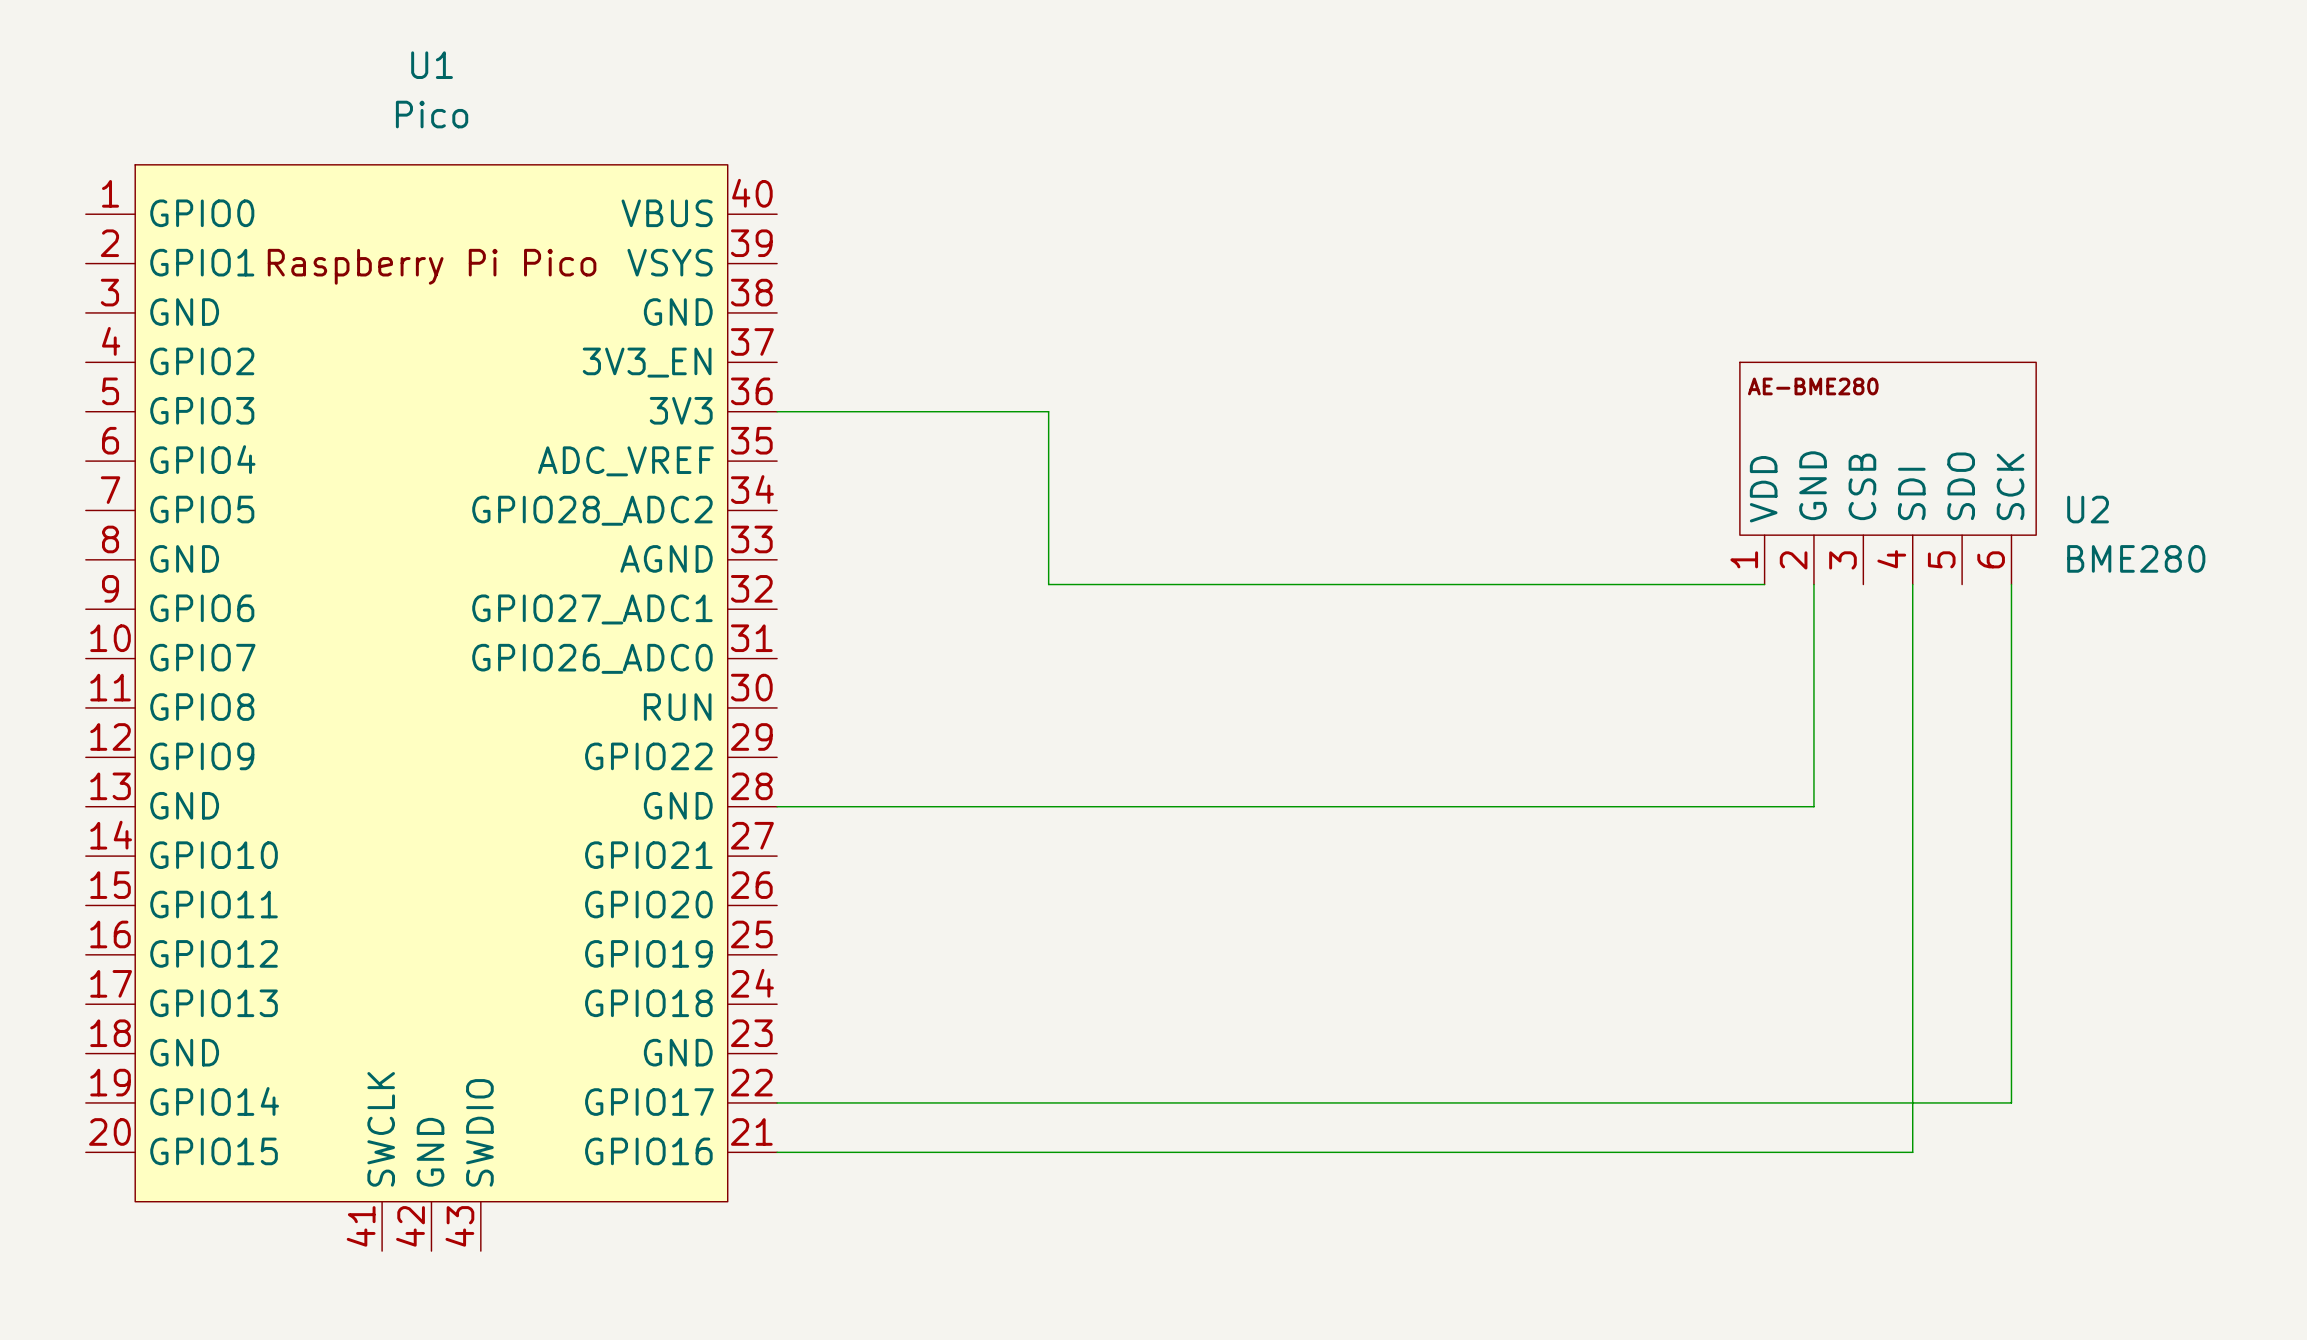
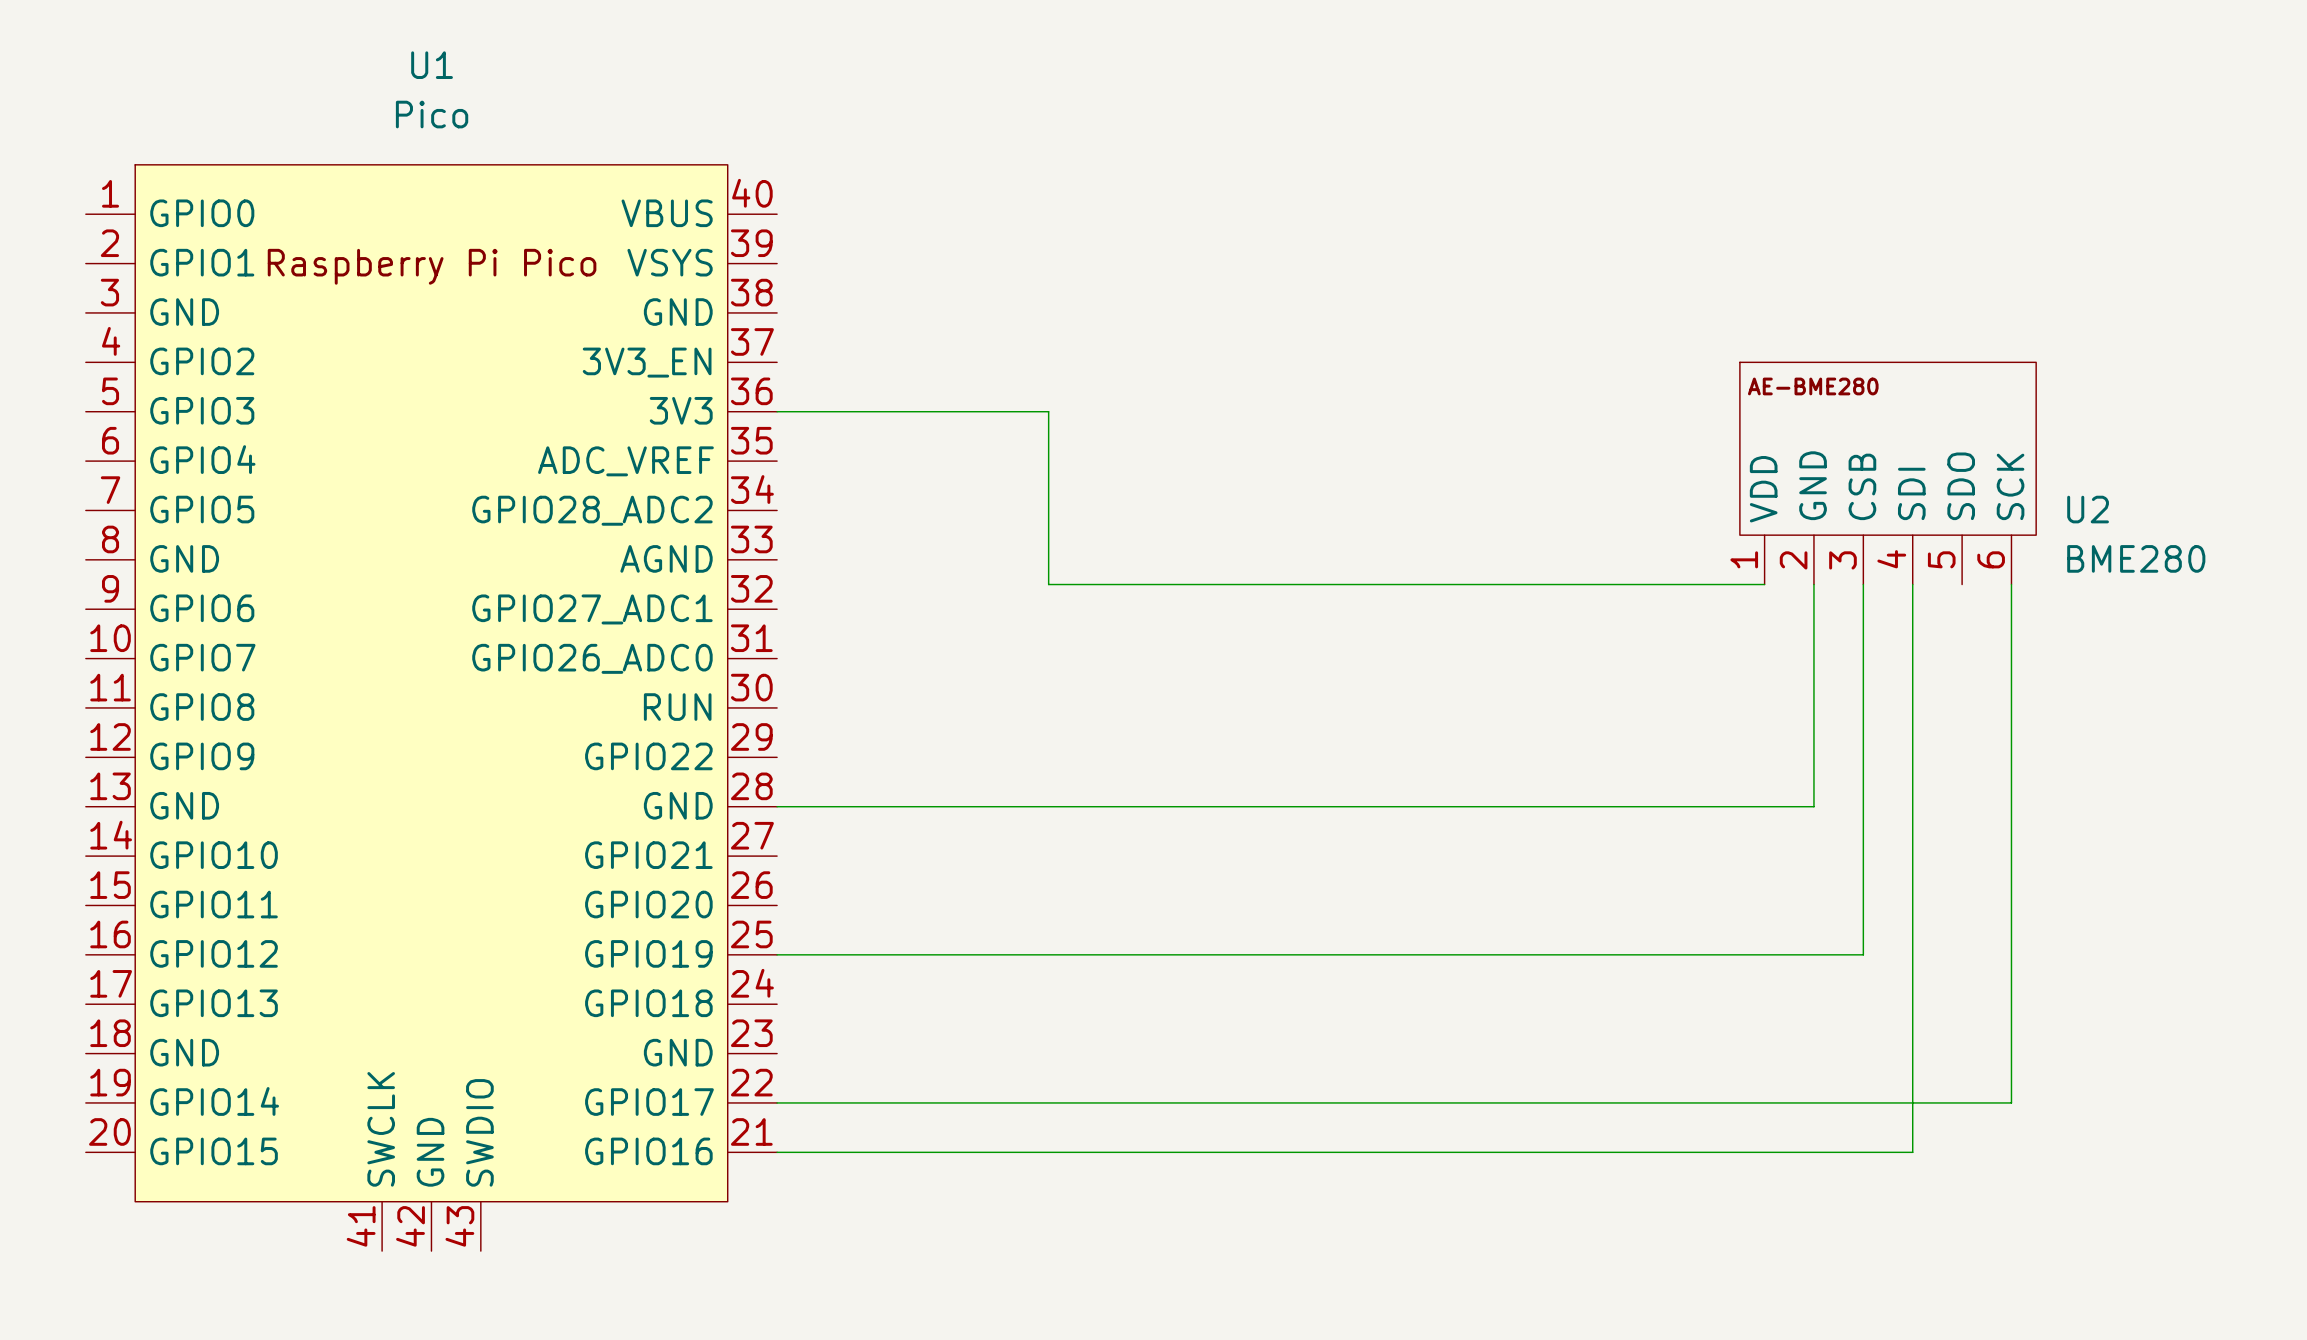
wire: none -> (1863, 584) (1863, 954) (777, 954)

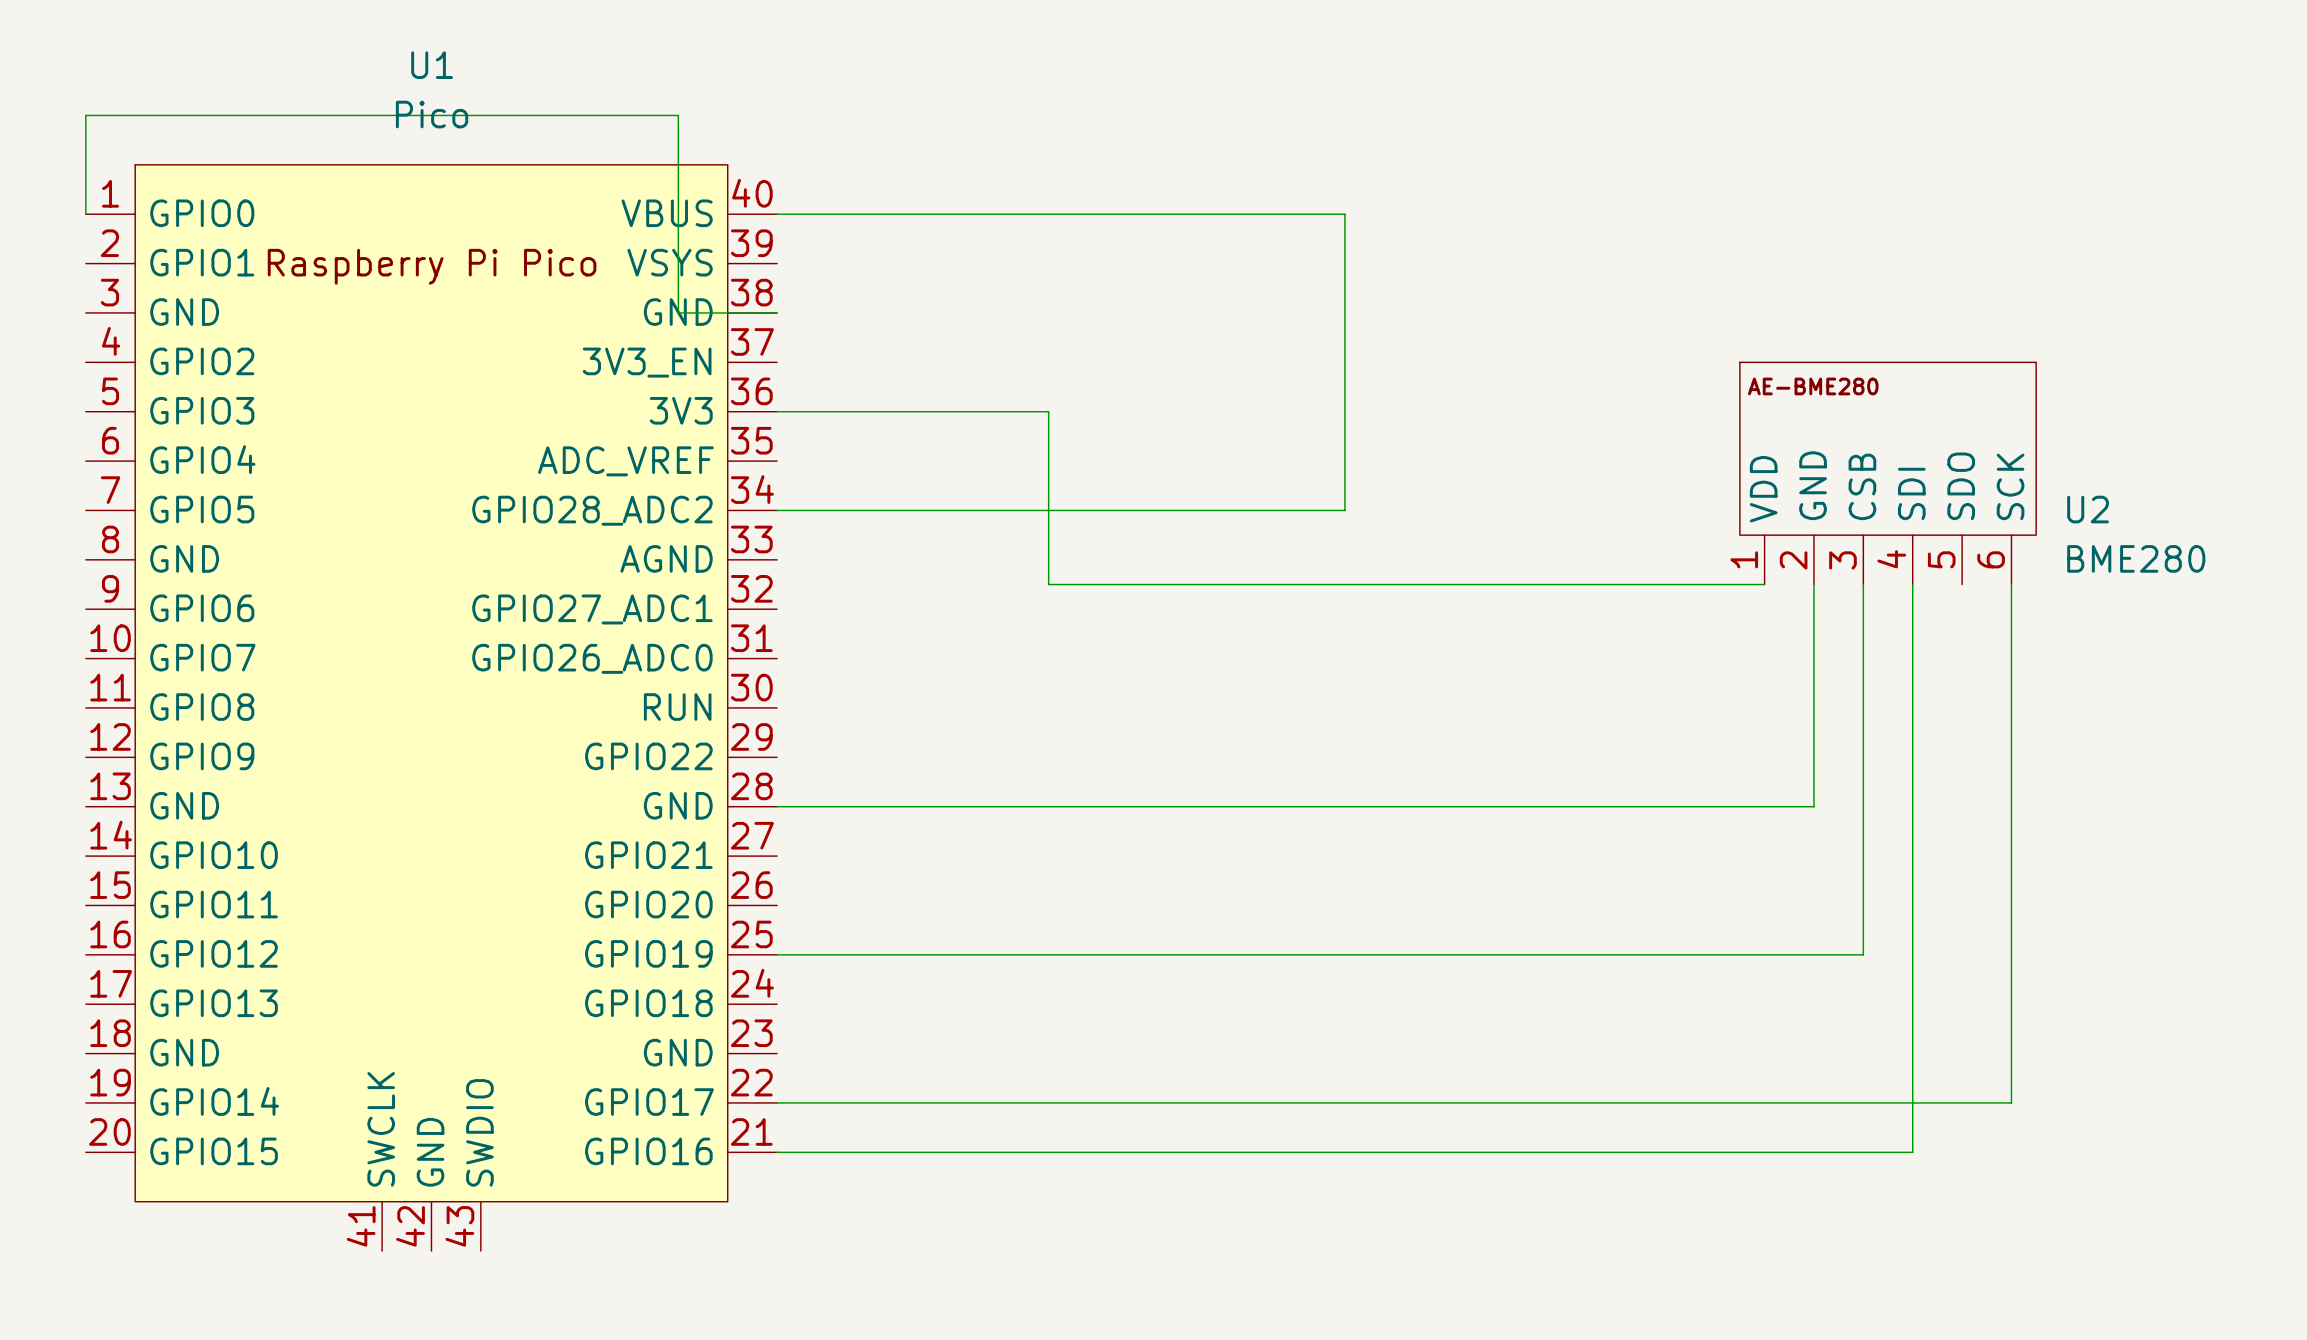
wire: none -> (85, 214) (85, 115) (678, 115) (678, 312) (777, 312)
wire: none -> (777, 214) (1344, 214) (1344, 510) (777, 510)

